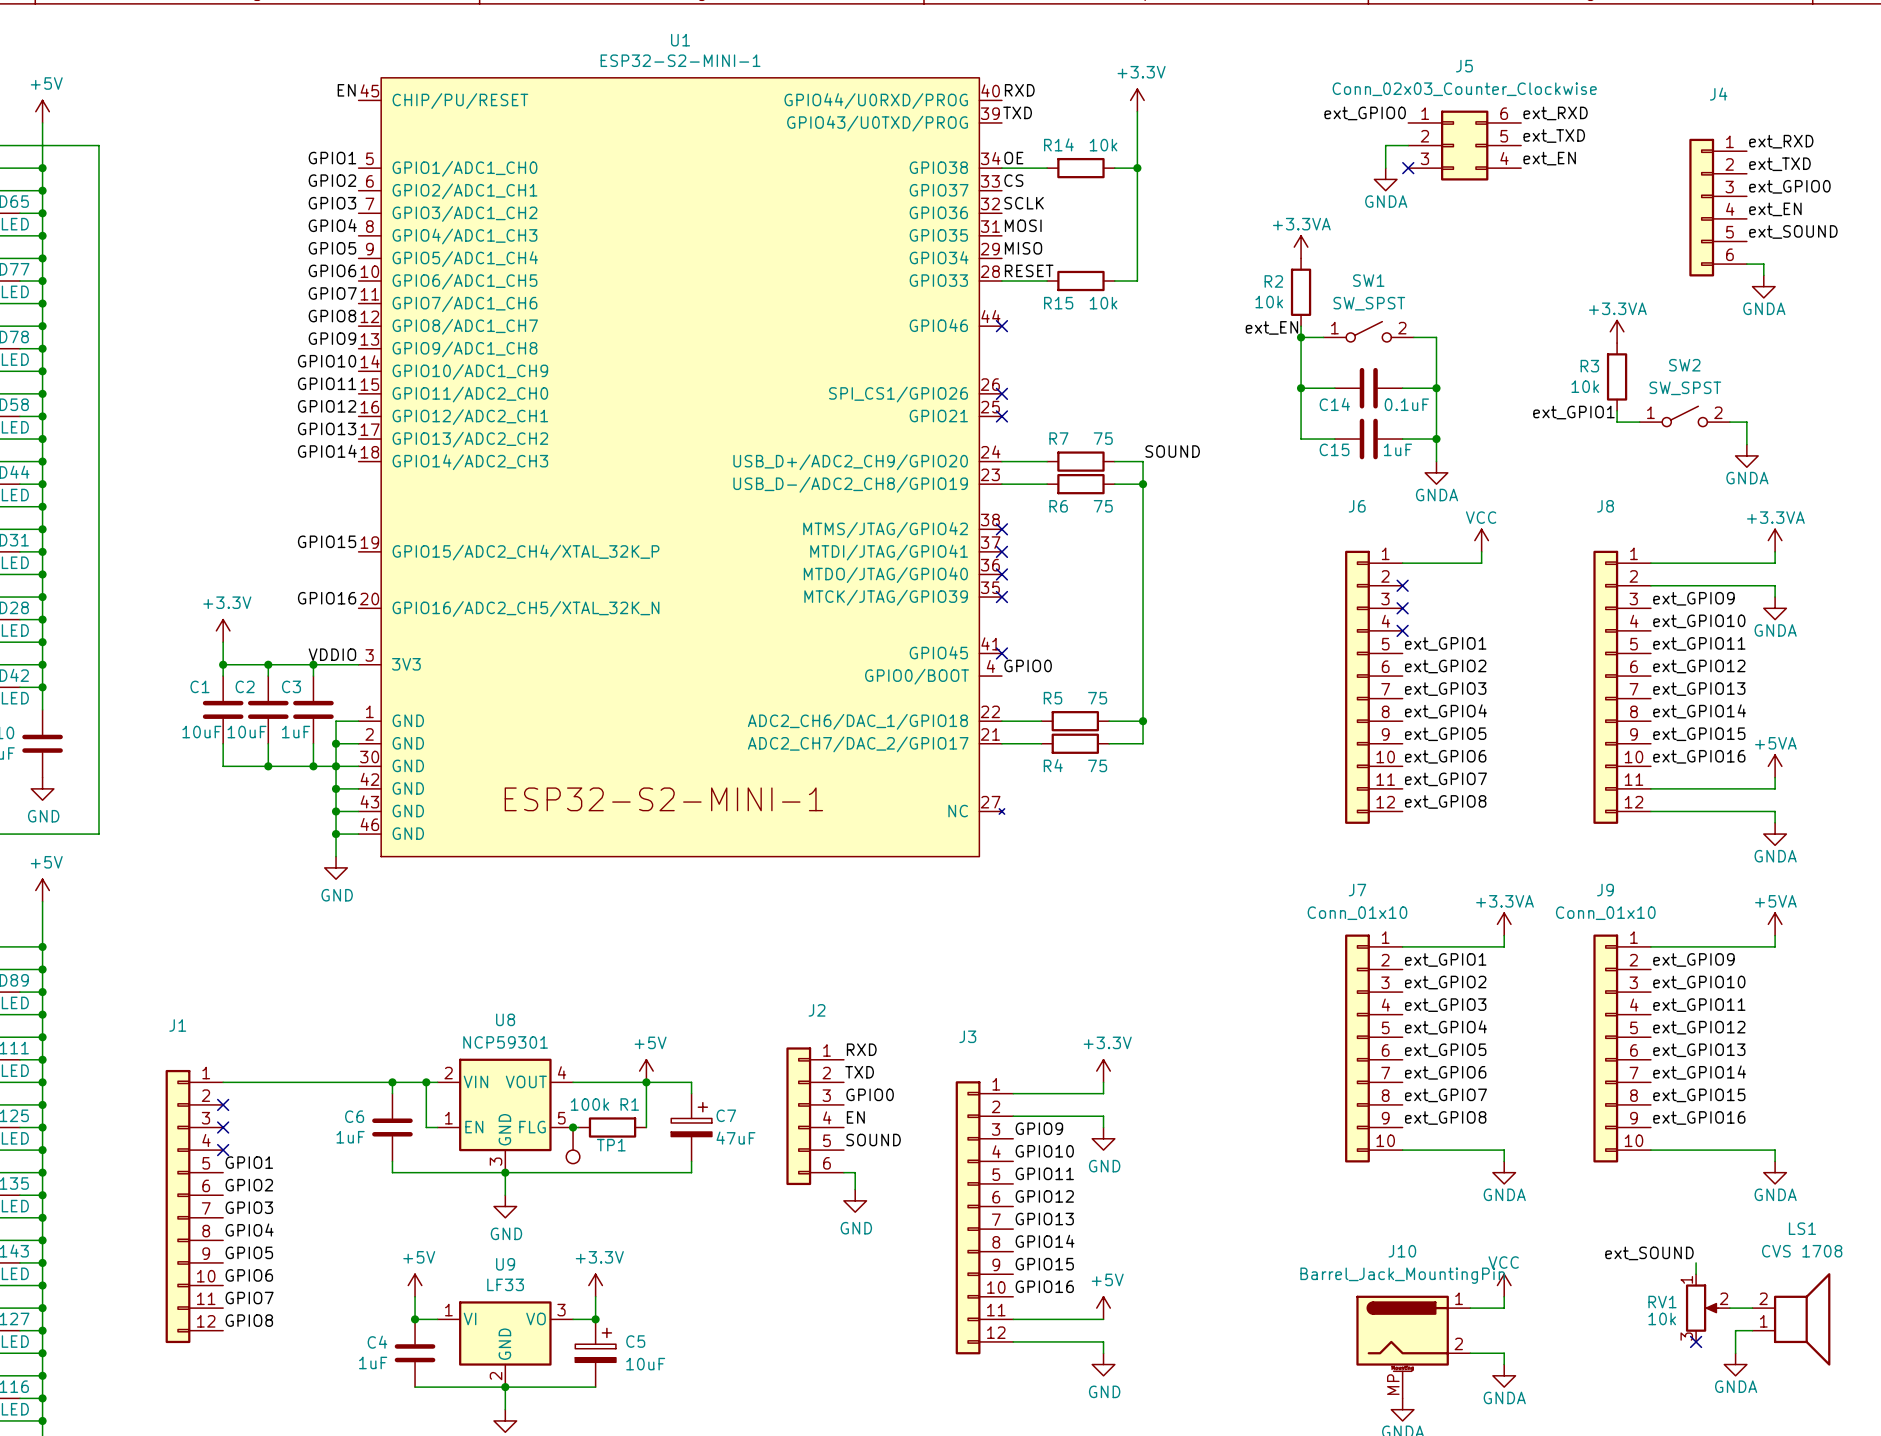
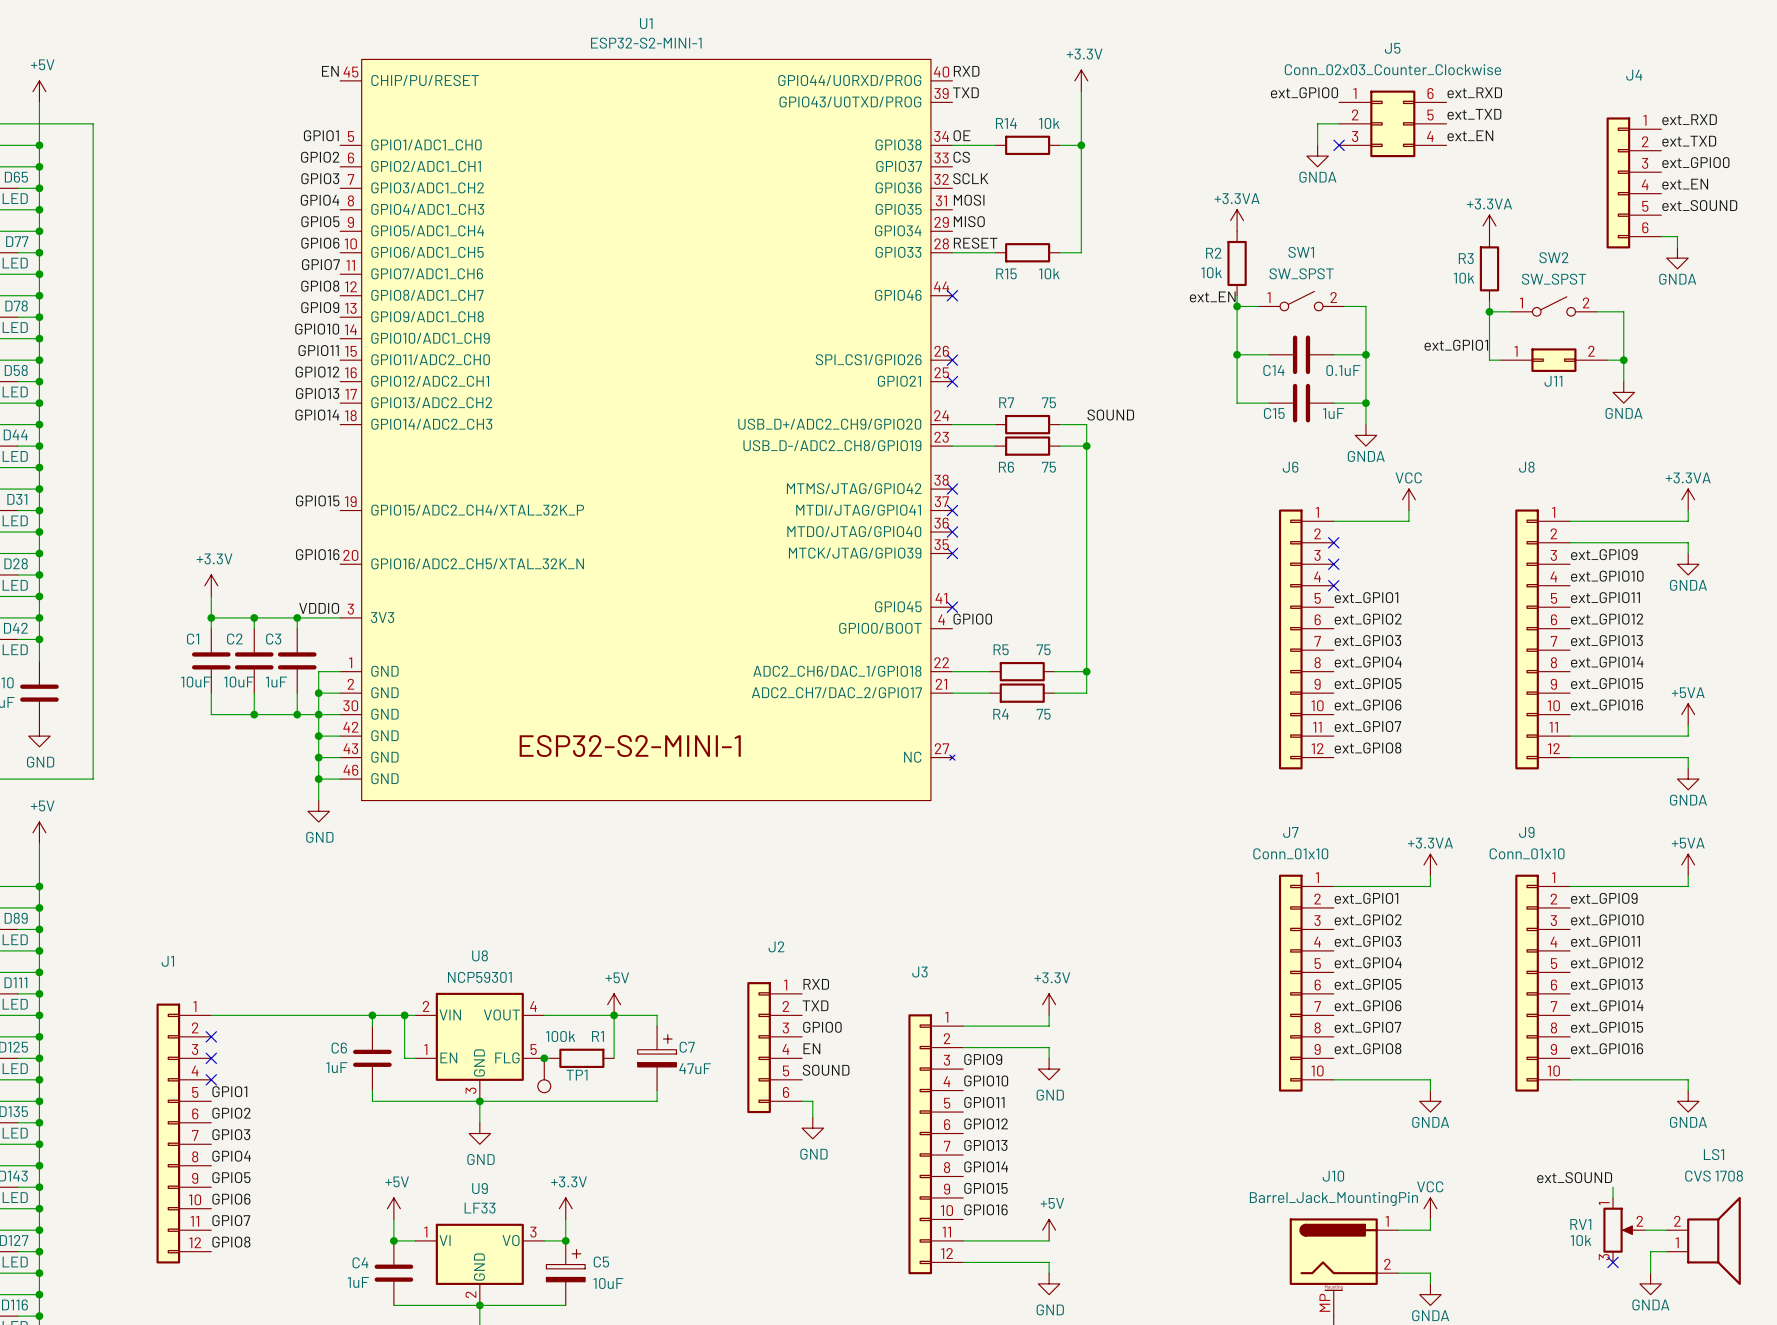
wire: none -> (1489, 301) (1489, 360) (1500, 360)
power symbol position: +3.3VA (1617, 331) -> +3.3VA (1489, 225)
wire: none -> (1489, 311) (1510, 311)
junction: none -> (1489, 311)
wire: none -> (1596, 311) (1623, 311) (1623, 381)
R3 position: (1617, 376) -> (1489, 268)
J11: none -> (1553, 360)
wire: none -> (1607, 360) (1623, 360)
junction: none -> (1623, 360)
wire: (1617, 410) (1617, 422) (1639, 422) -> none
label position: ext_GPIO1 (1573, 412) -> ext_GPIO1 (1456, 345)
SW2 position: (1684, 416) -> (1553, 306)
wire: (1729, 422) (1746, 422) (1746, 444) -> none
power symbol position: GNDA (1746, 455) -> GNDA (1623, 392)

